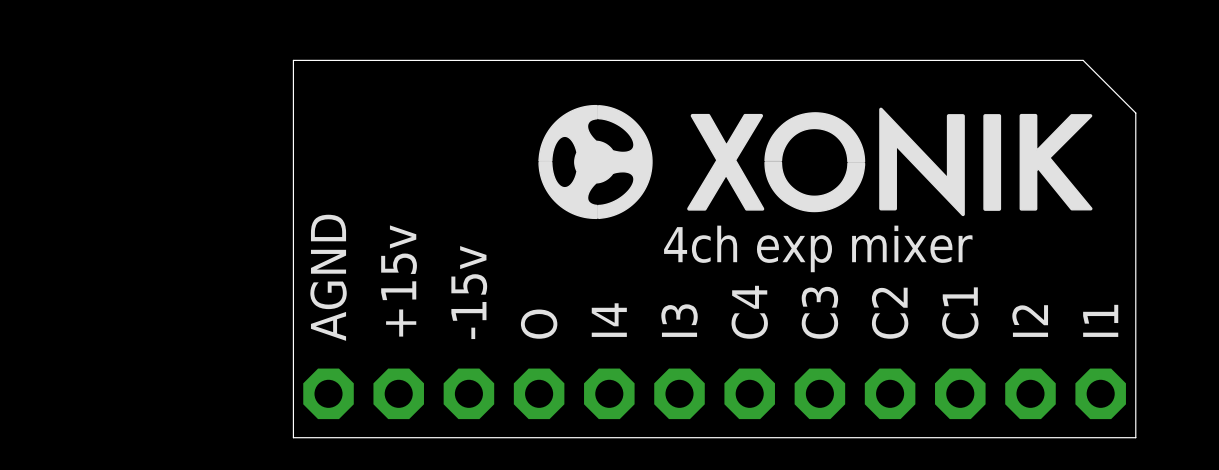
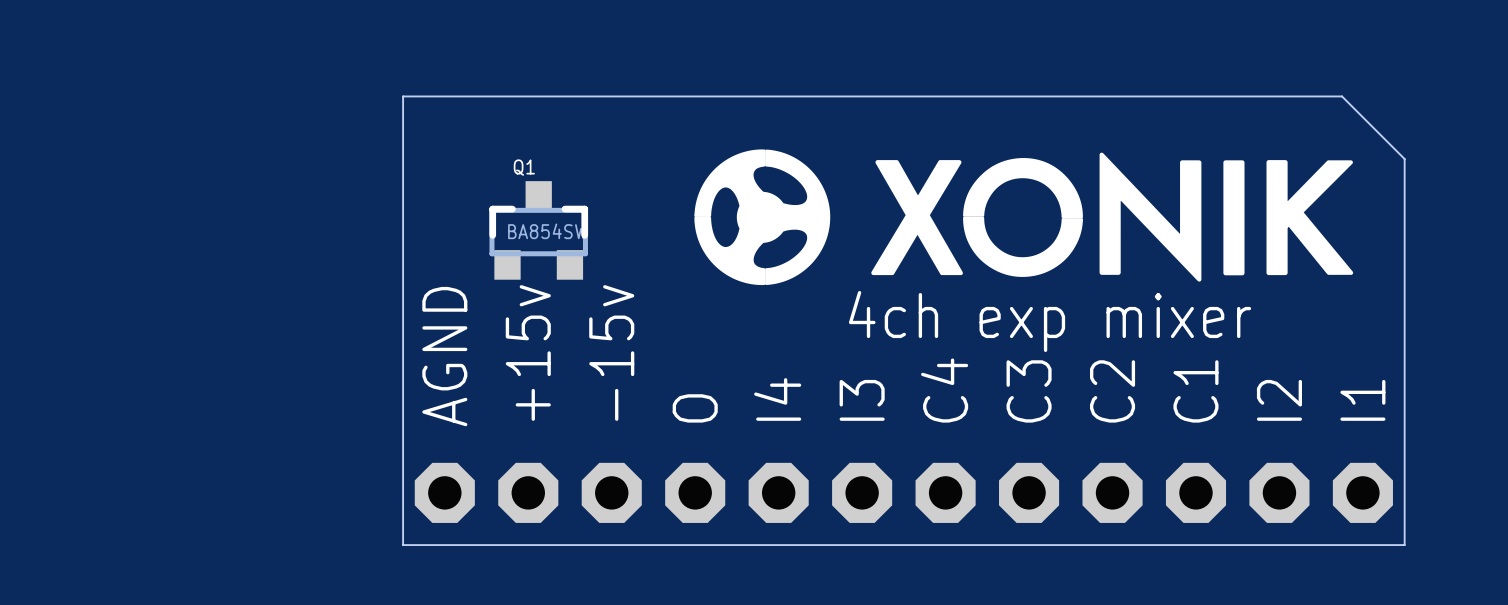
Q1: none -> BA854SW (538, 230)

